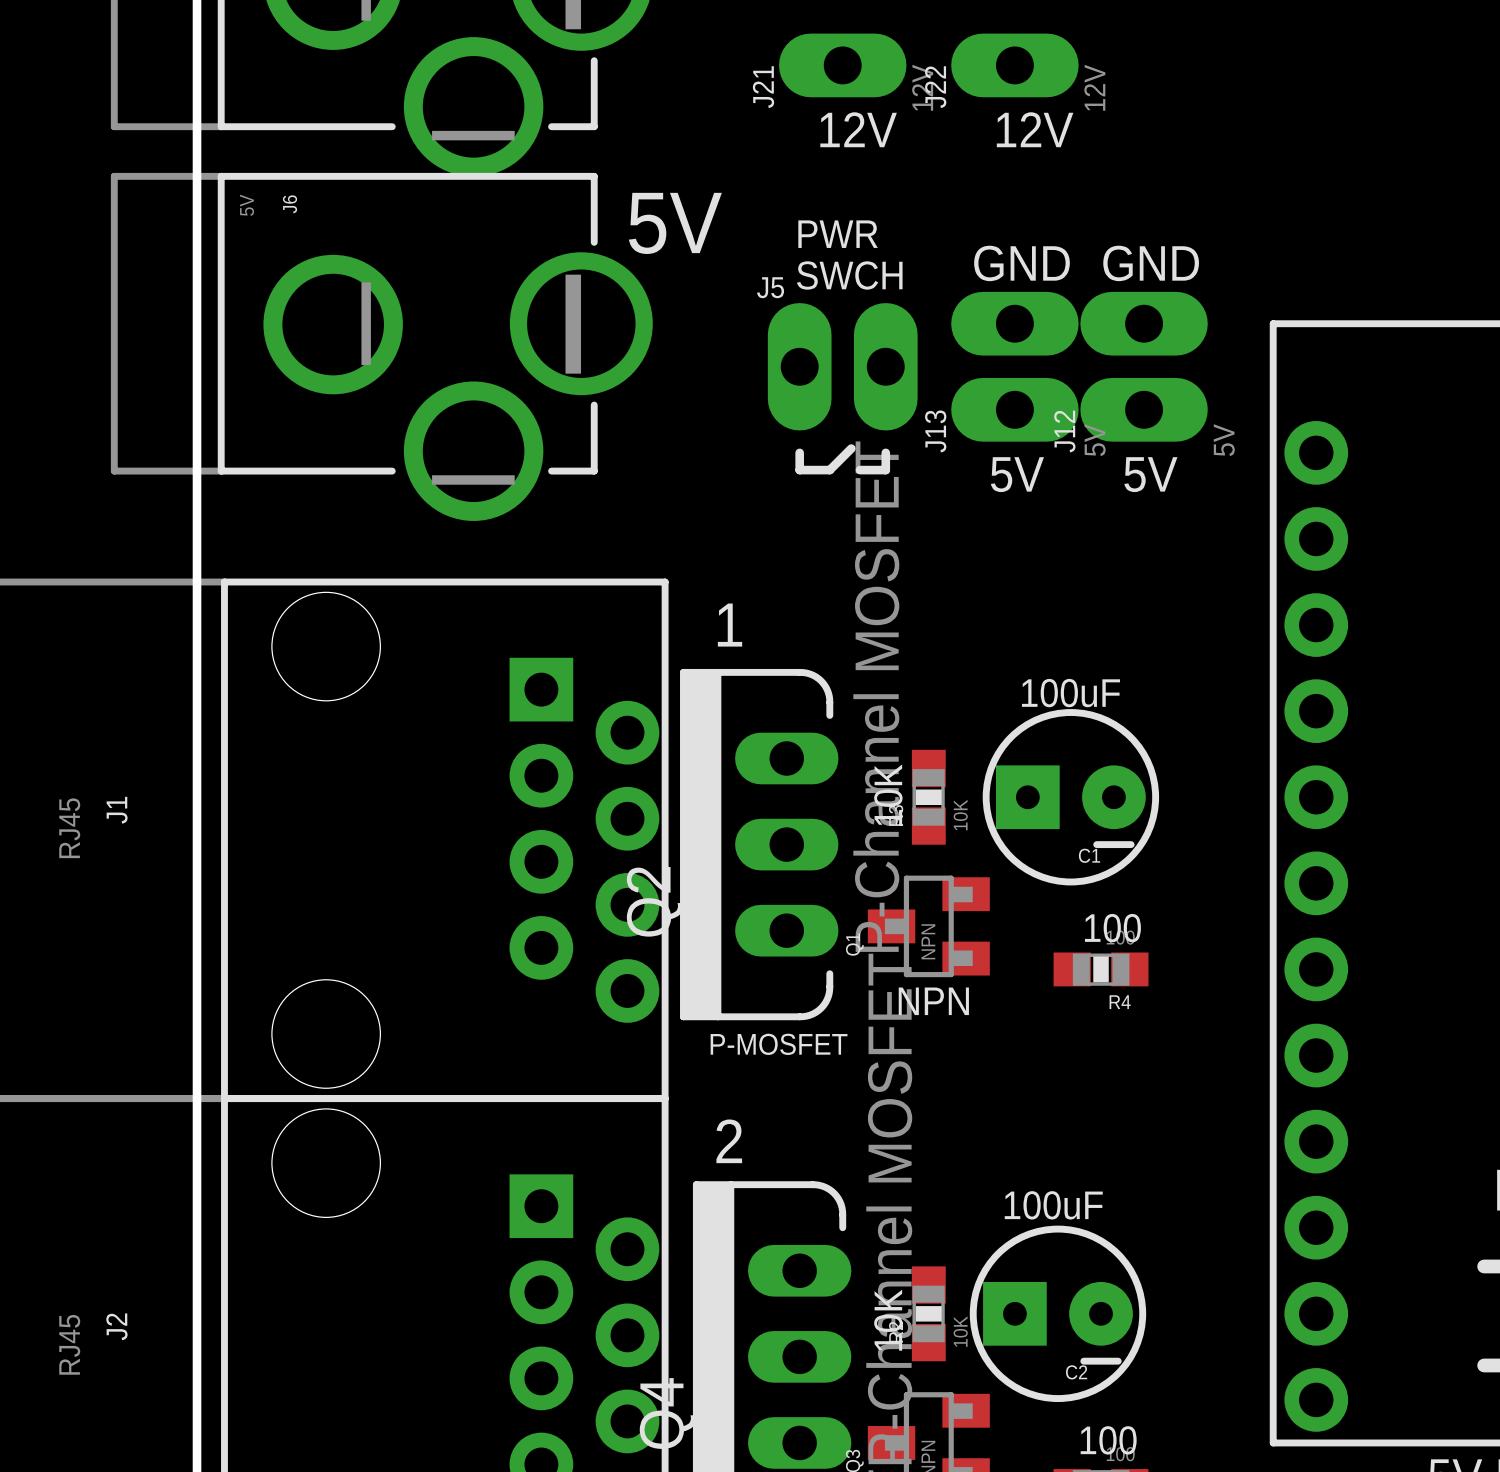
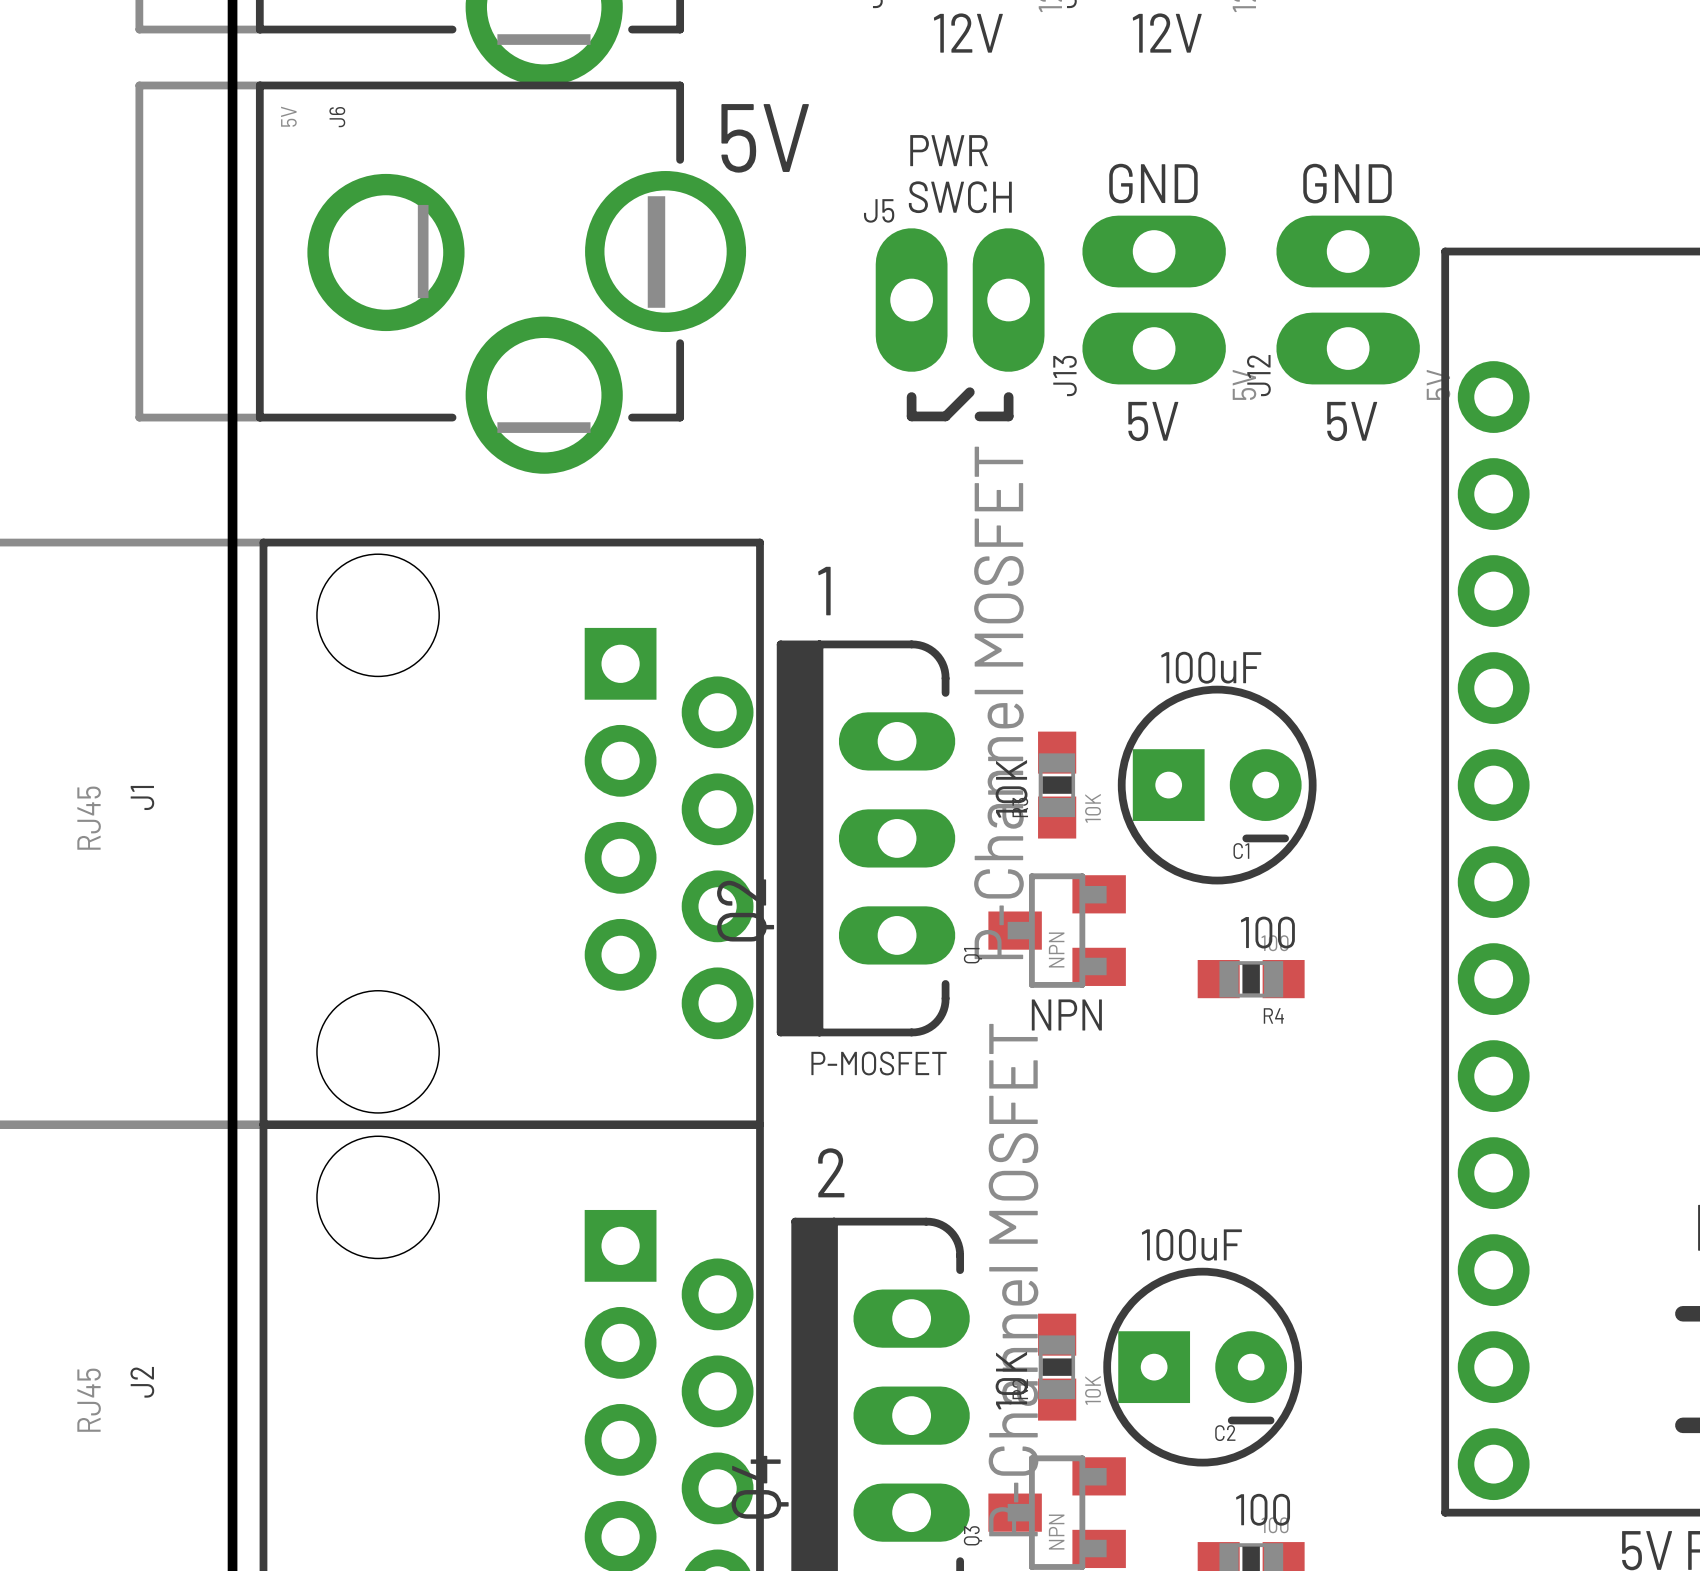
text position: GND (1151, 263) -> GND (1347, 183)
J12 position: (1144, 366) -> (1348, 300)
text position: 5V (1150, 474) -> 5V (1352, 421)

